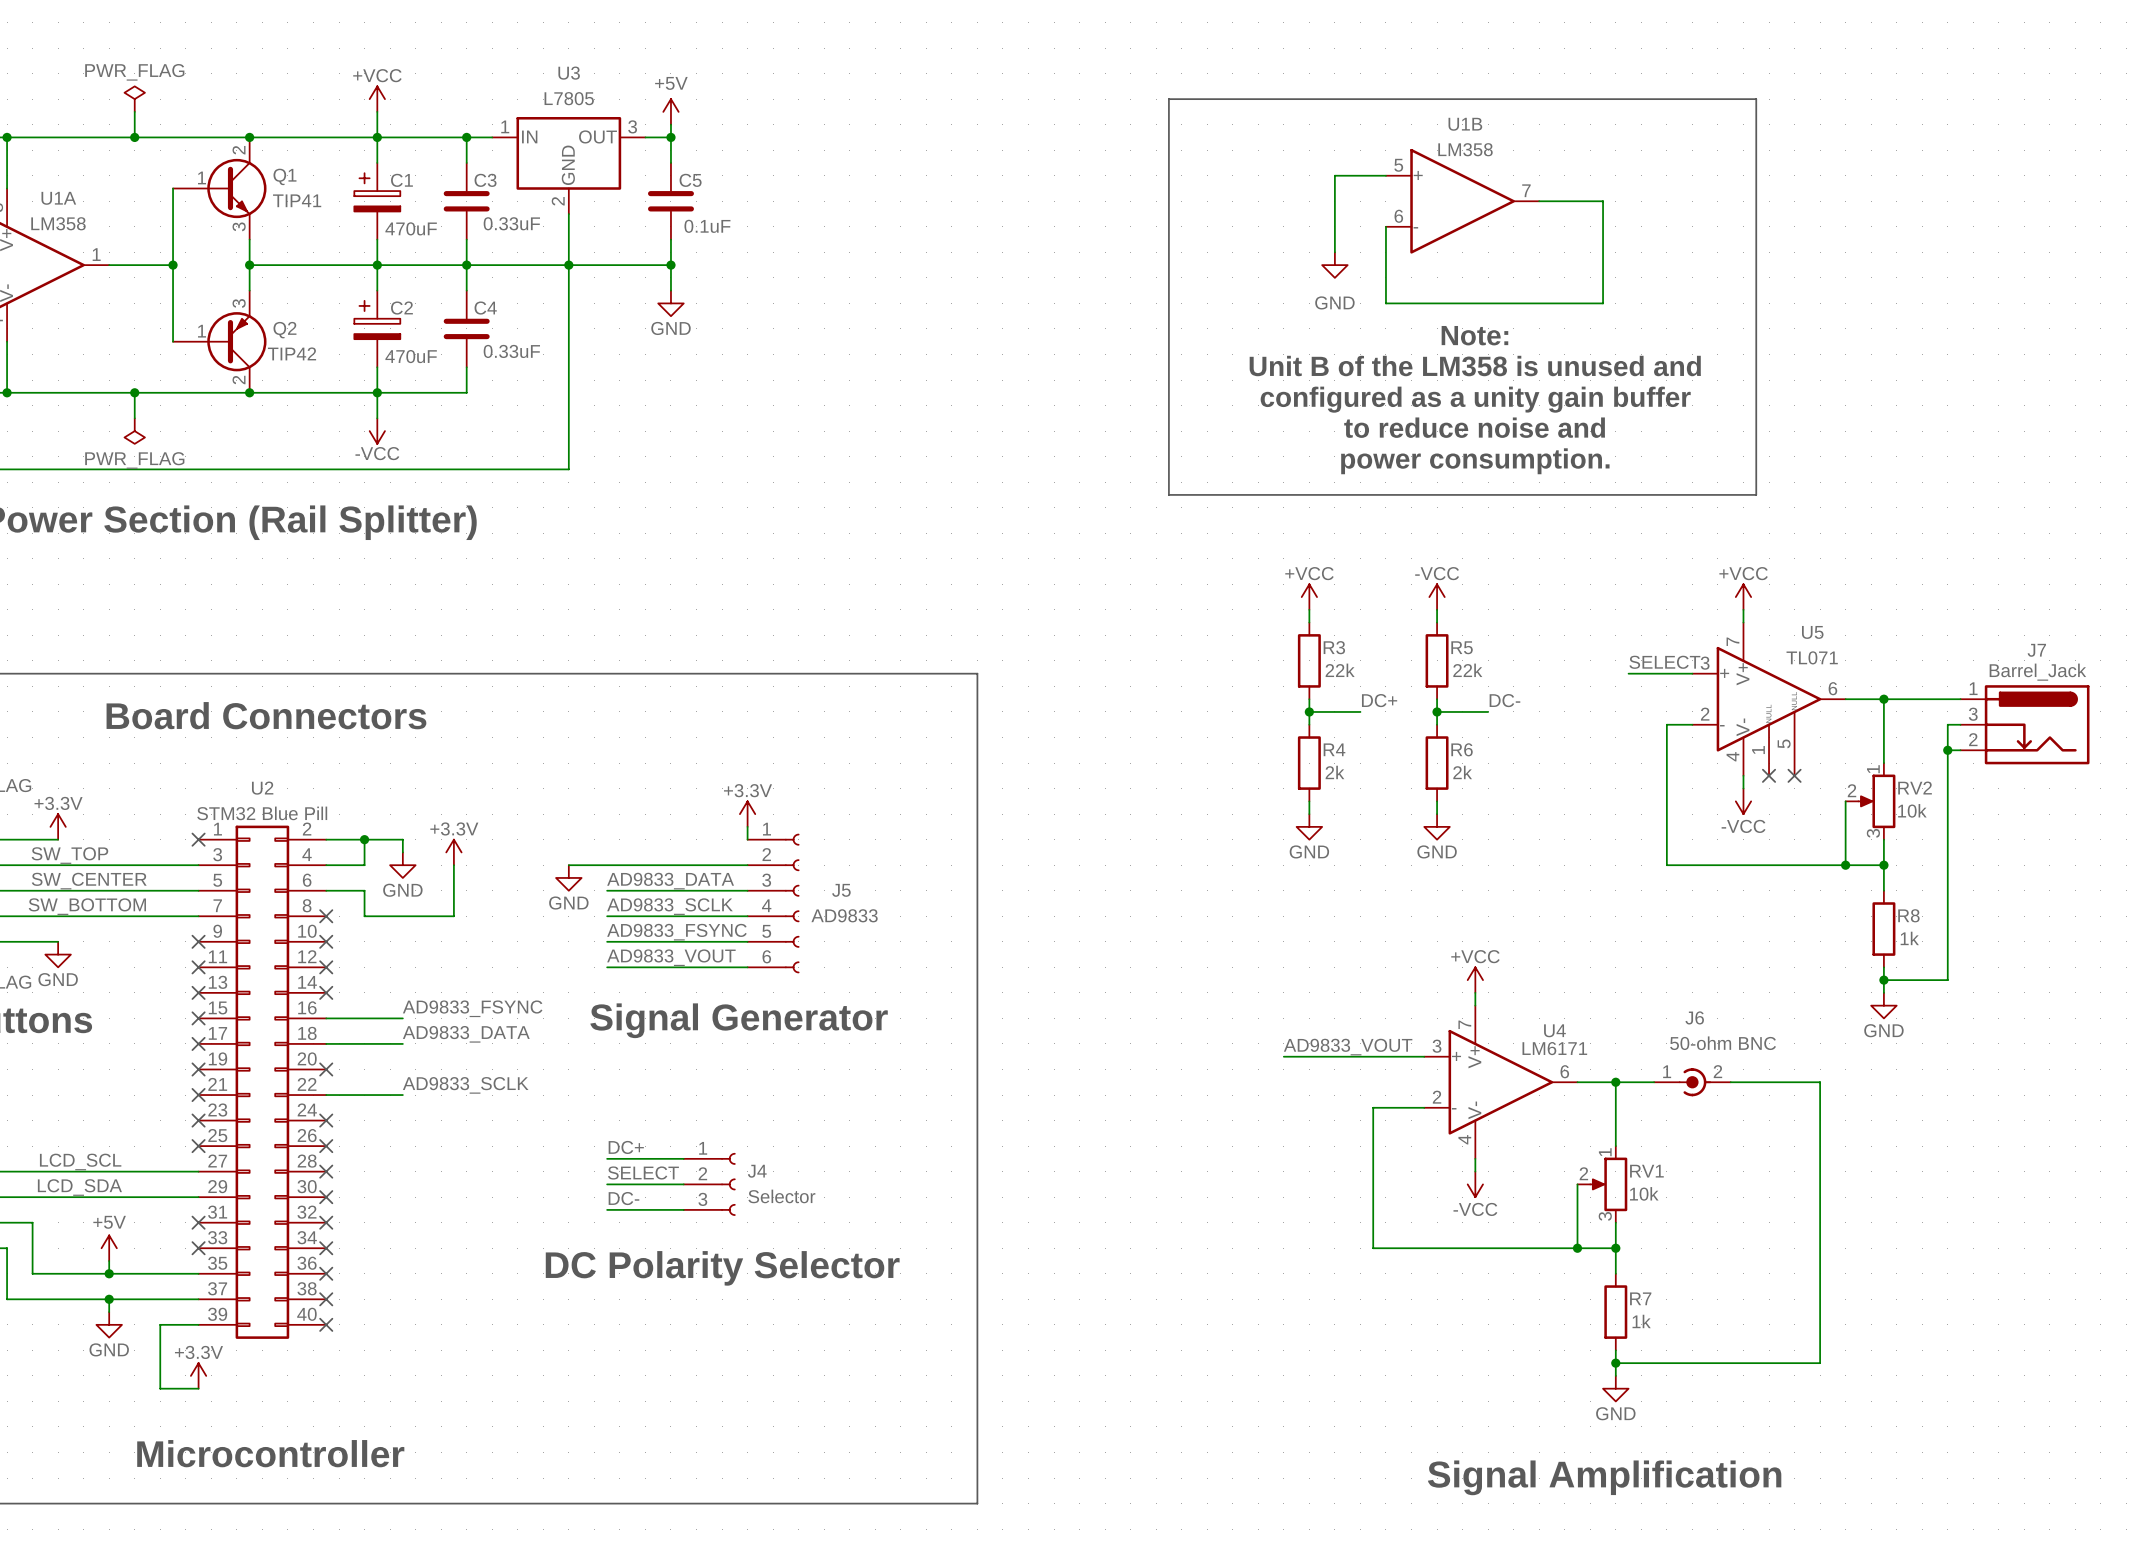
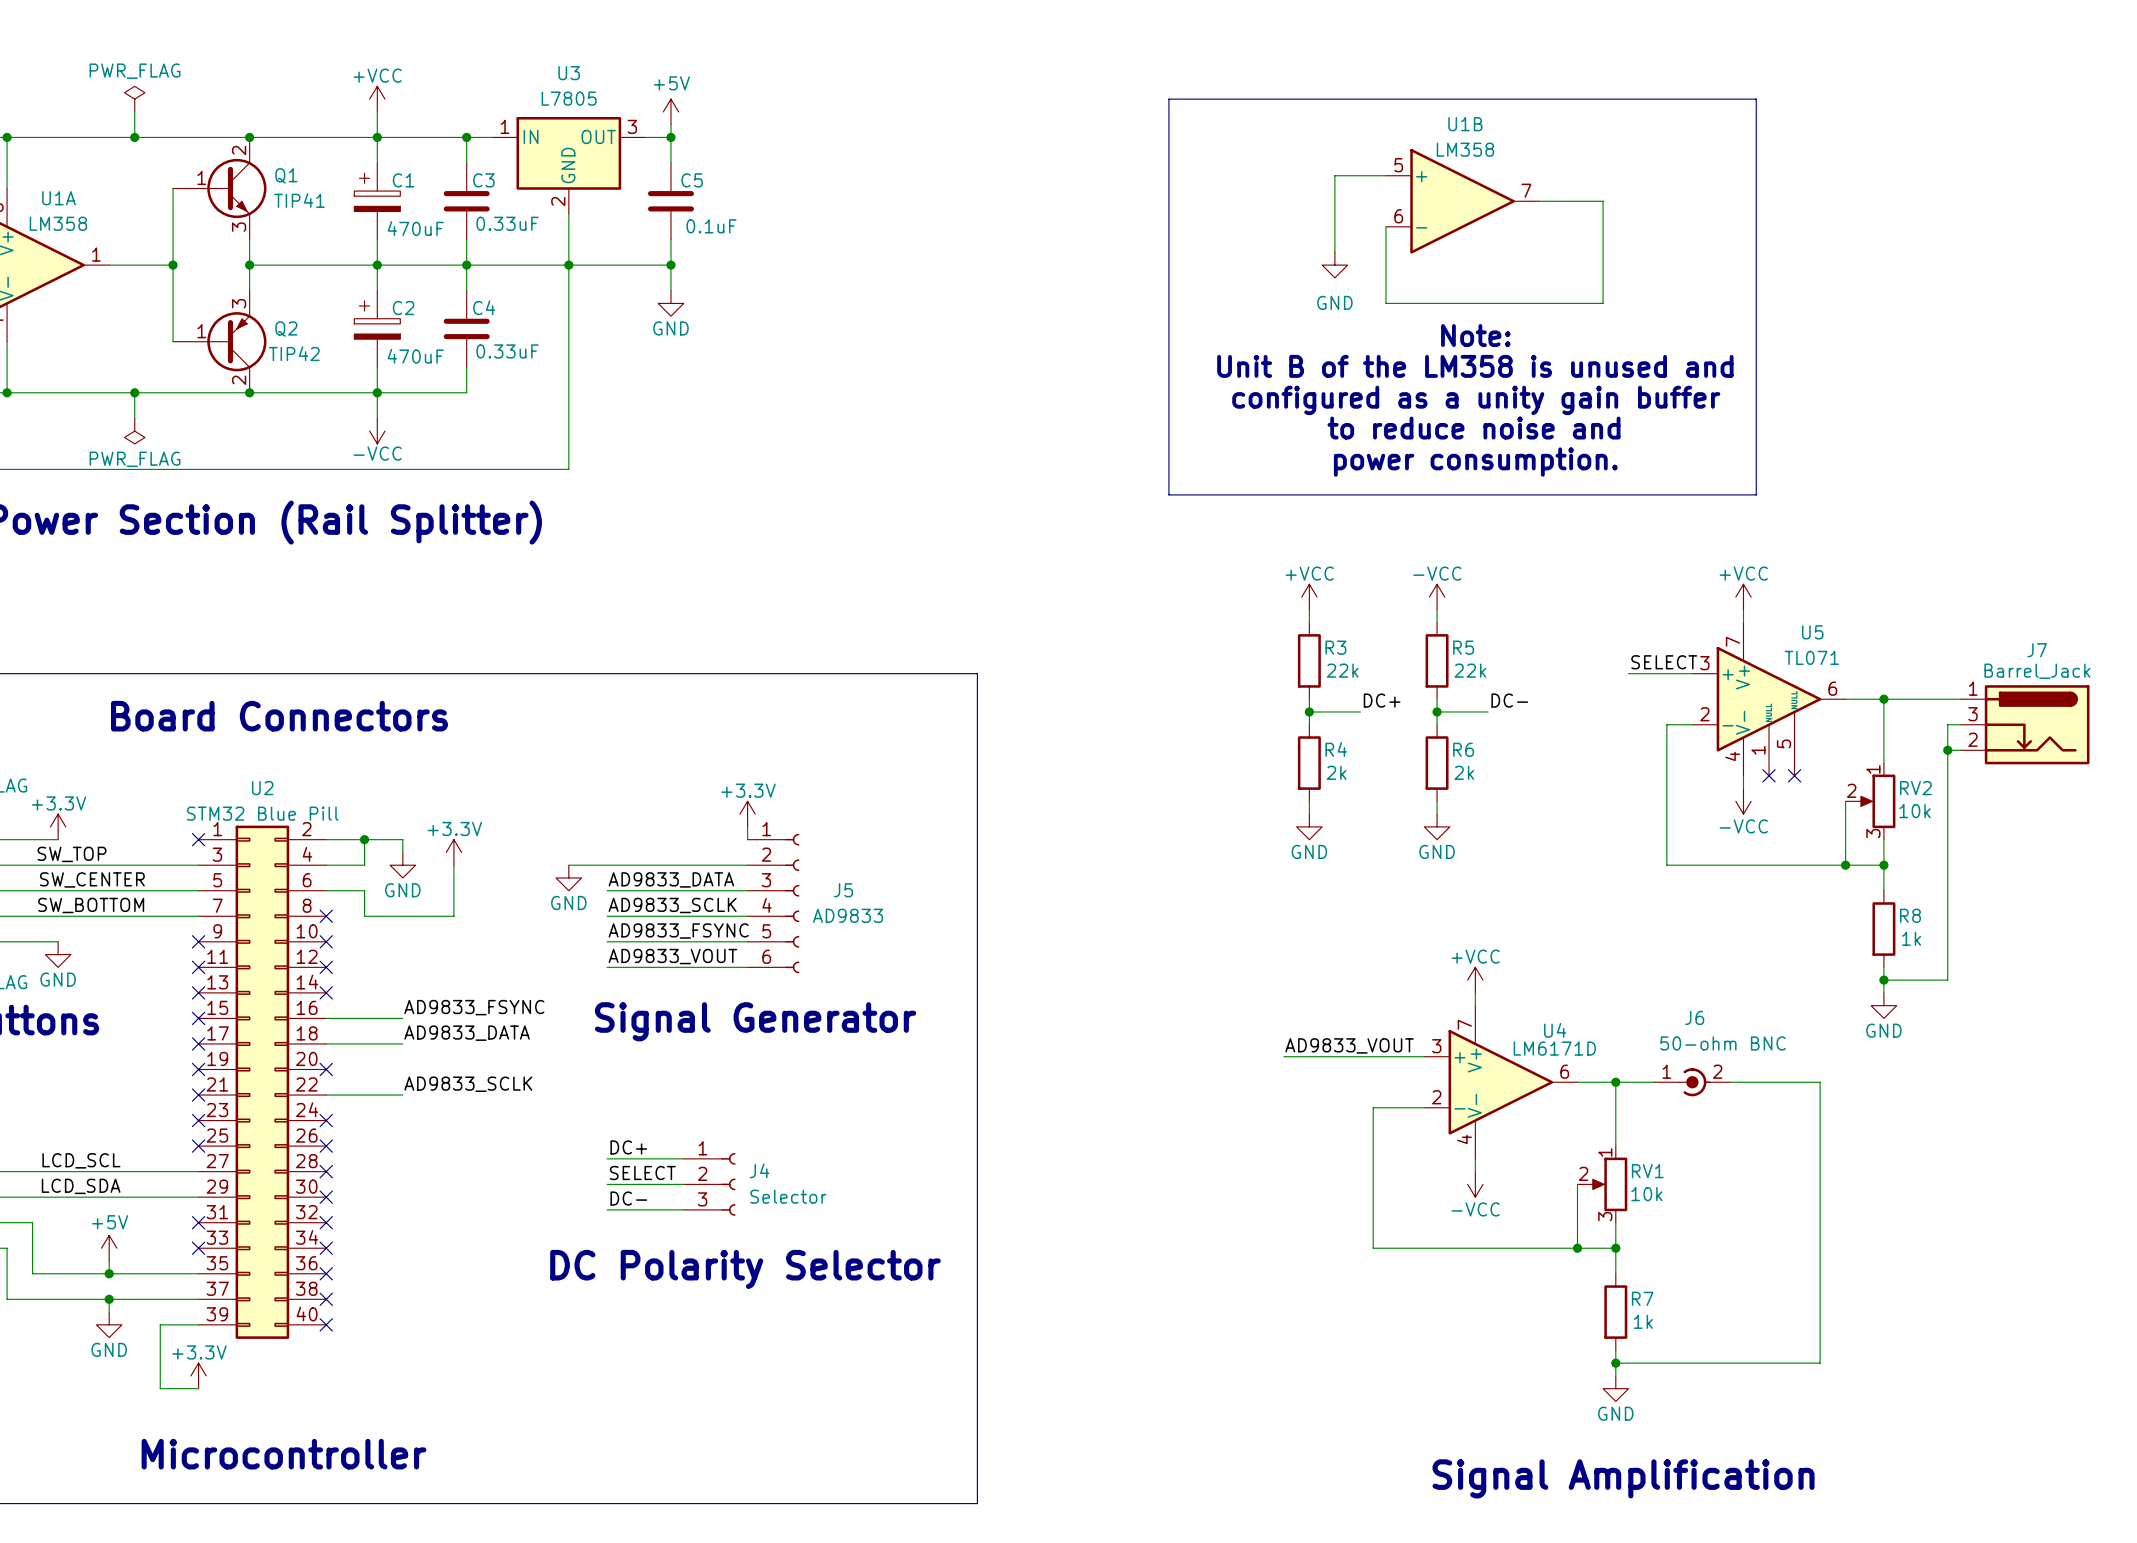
U4 value: LM6171 (1554, 1048) -> LM6171D (1554, 1048)

